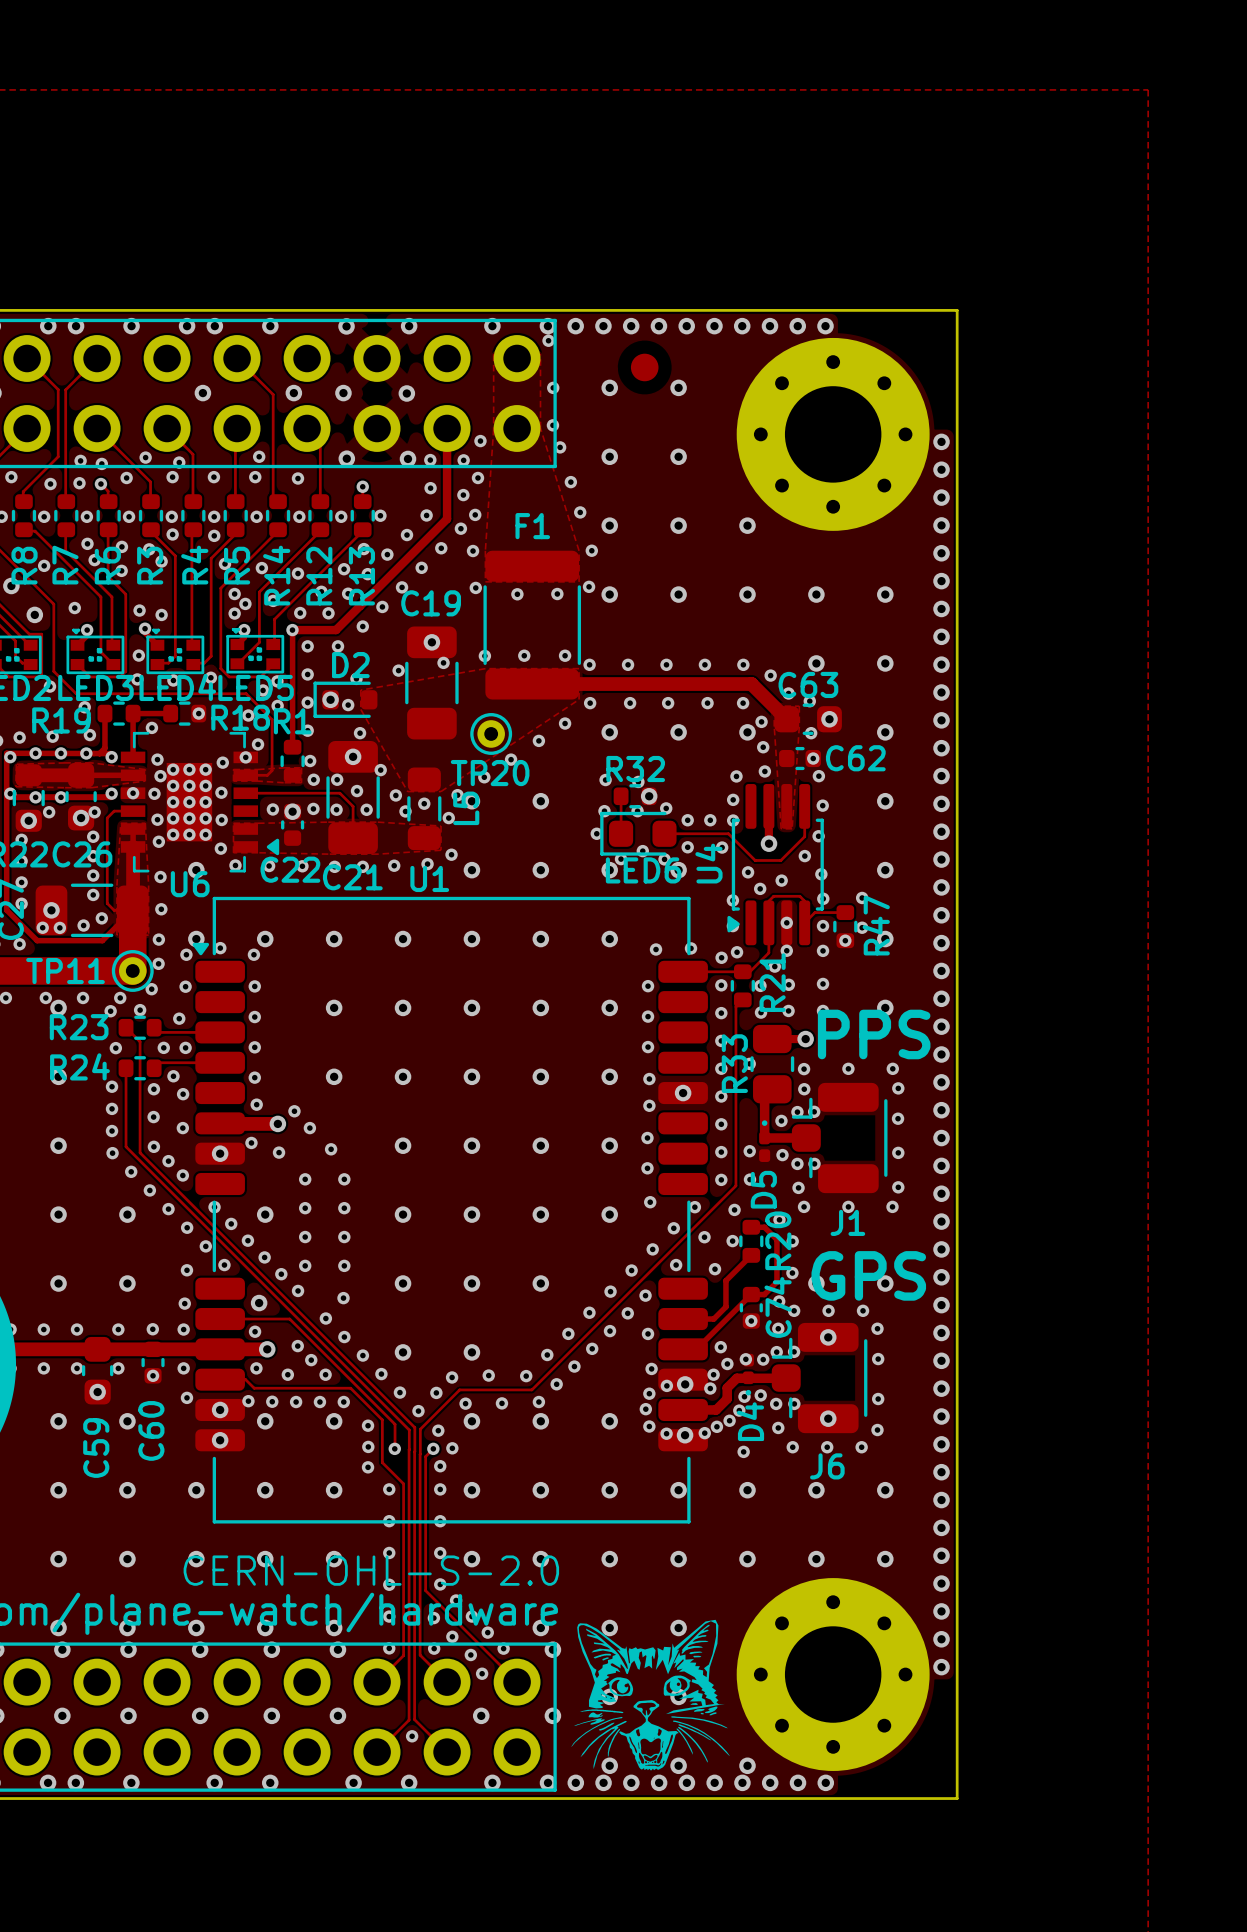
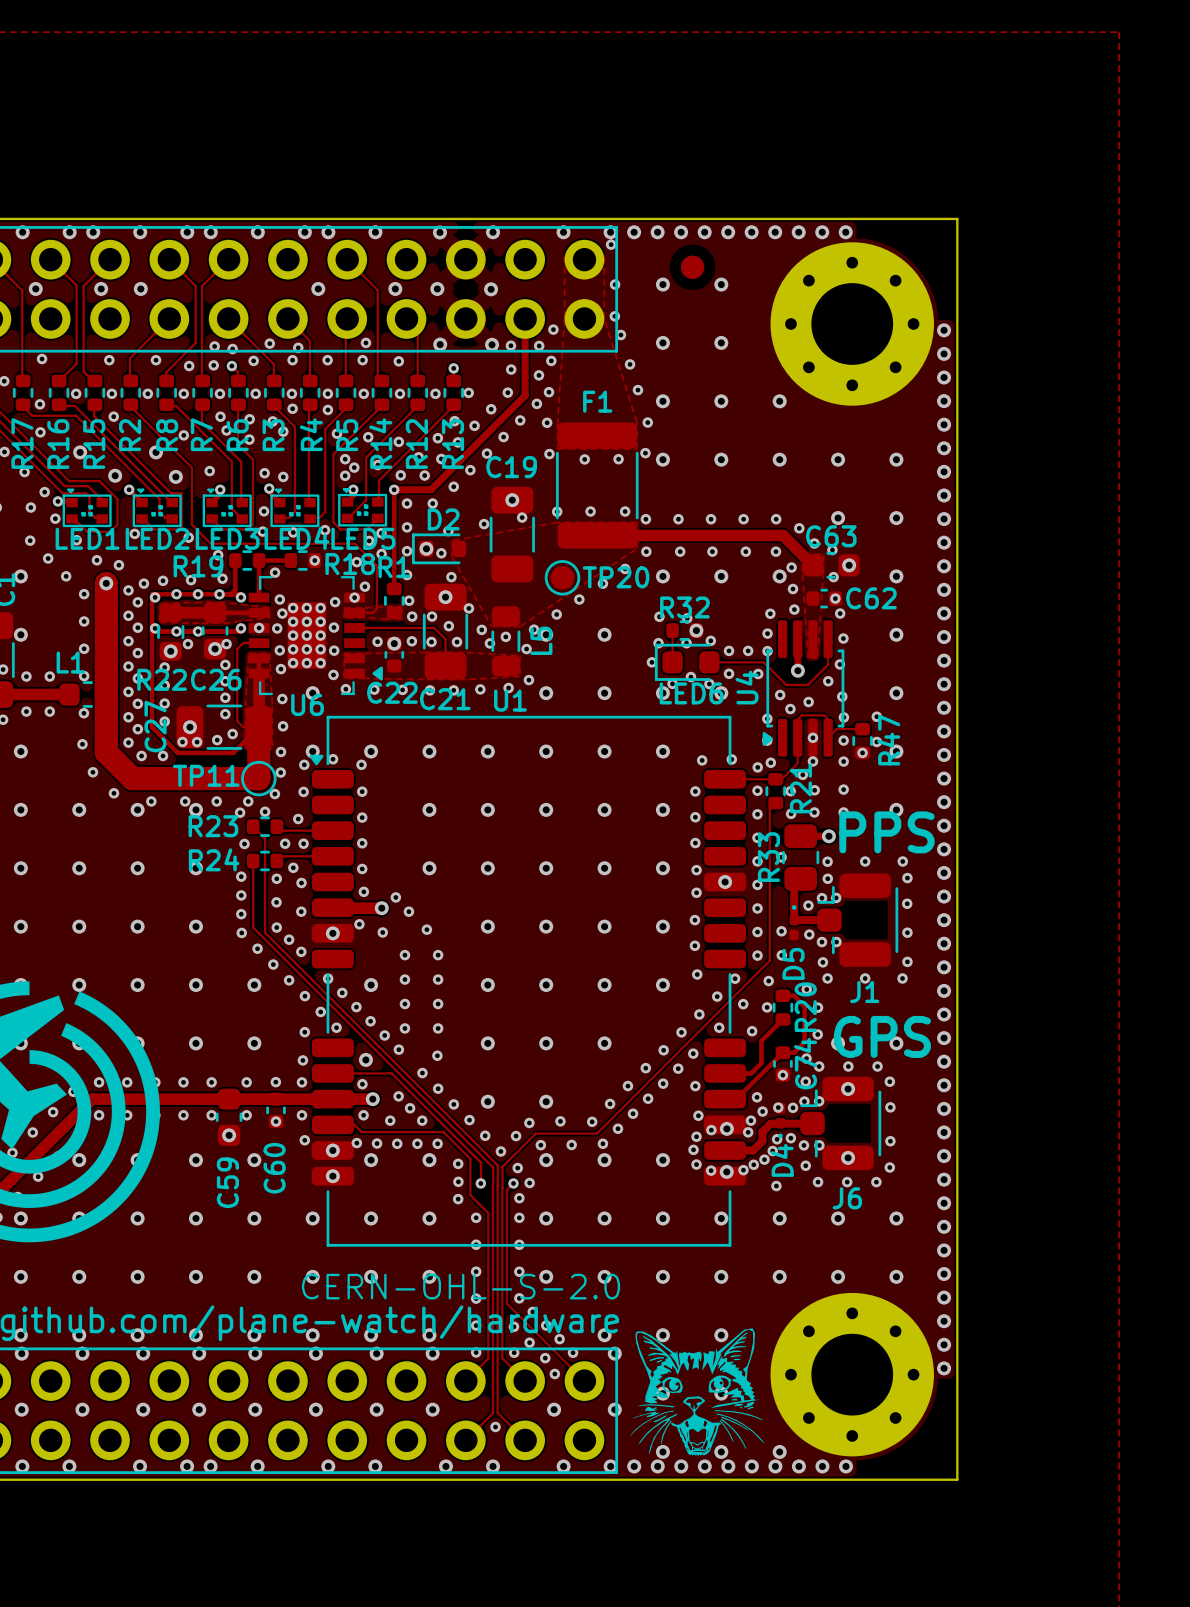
TP20 footprint: [470, 713, 513, 755] -> [544, 560, 581, 596]
TP20 name position: TP20 (490, 773) -> TP20 (616, 577)
TP11 footprint: [111, 950, 154, 992] -> [241, 760, 277, 797]

